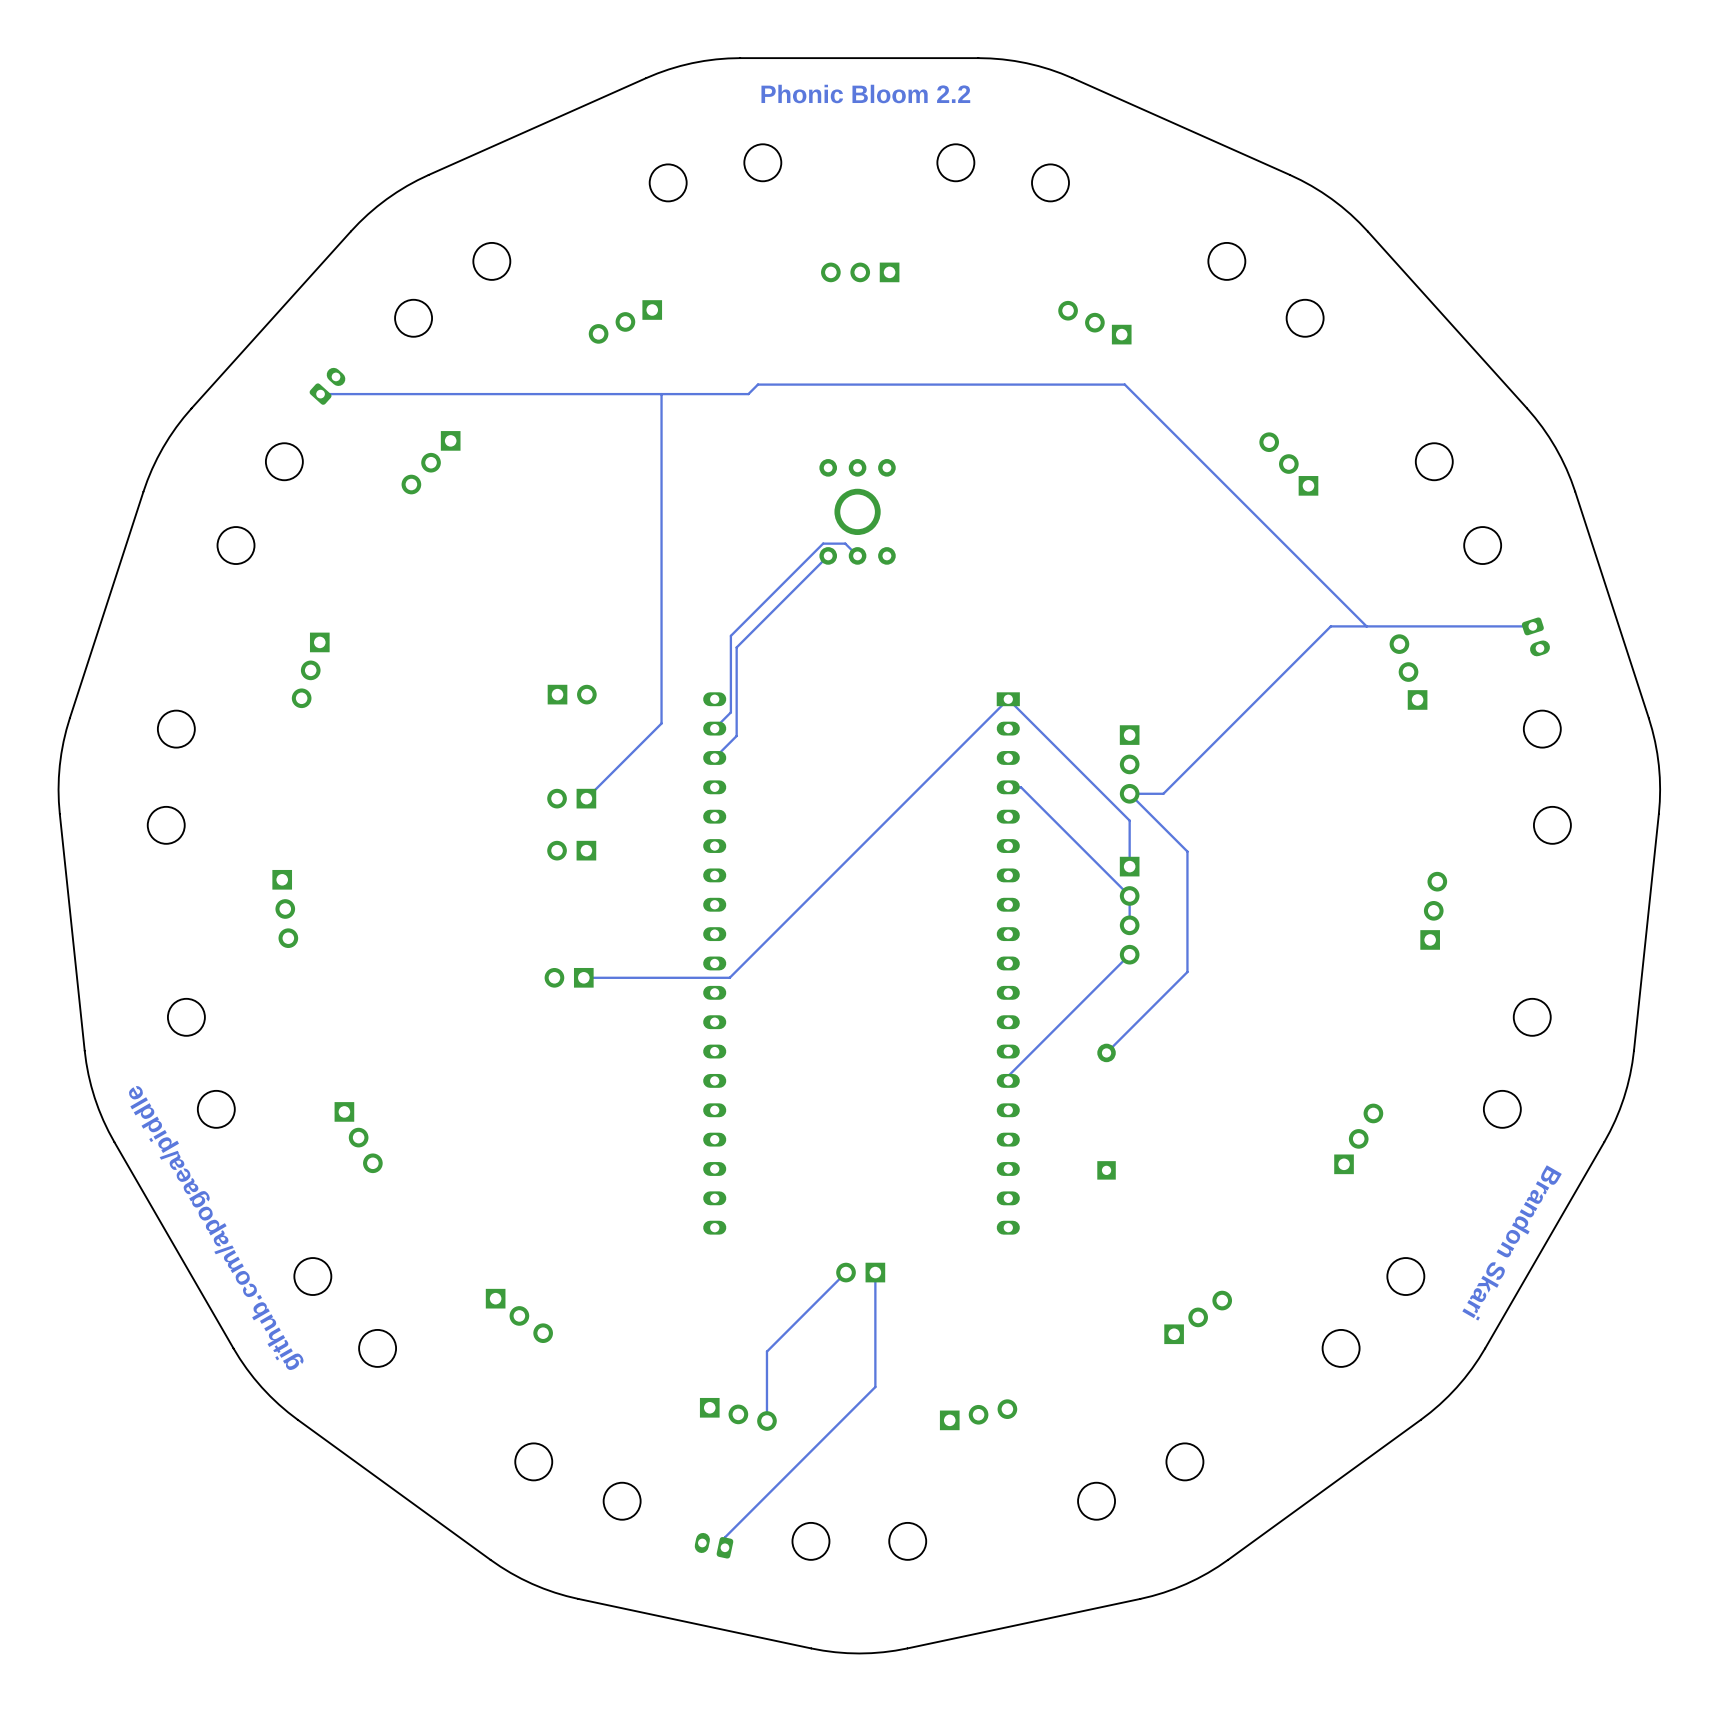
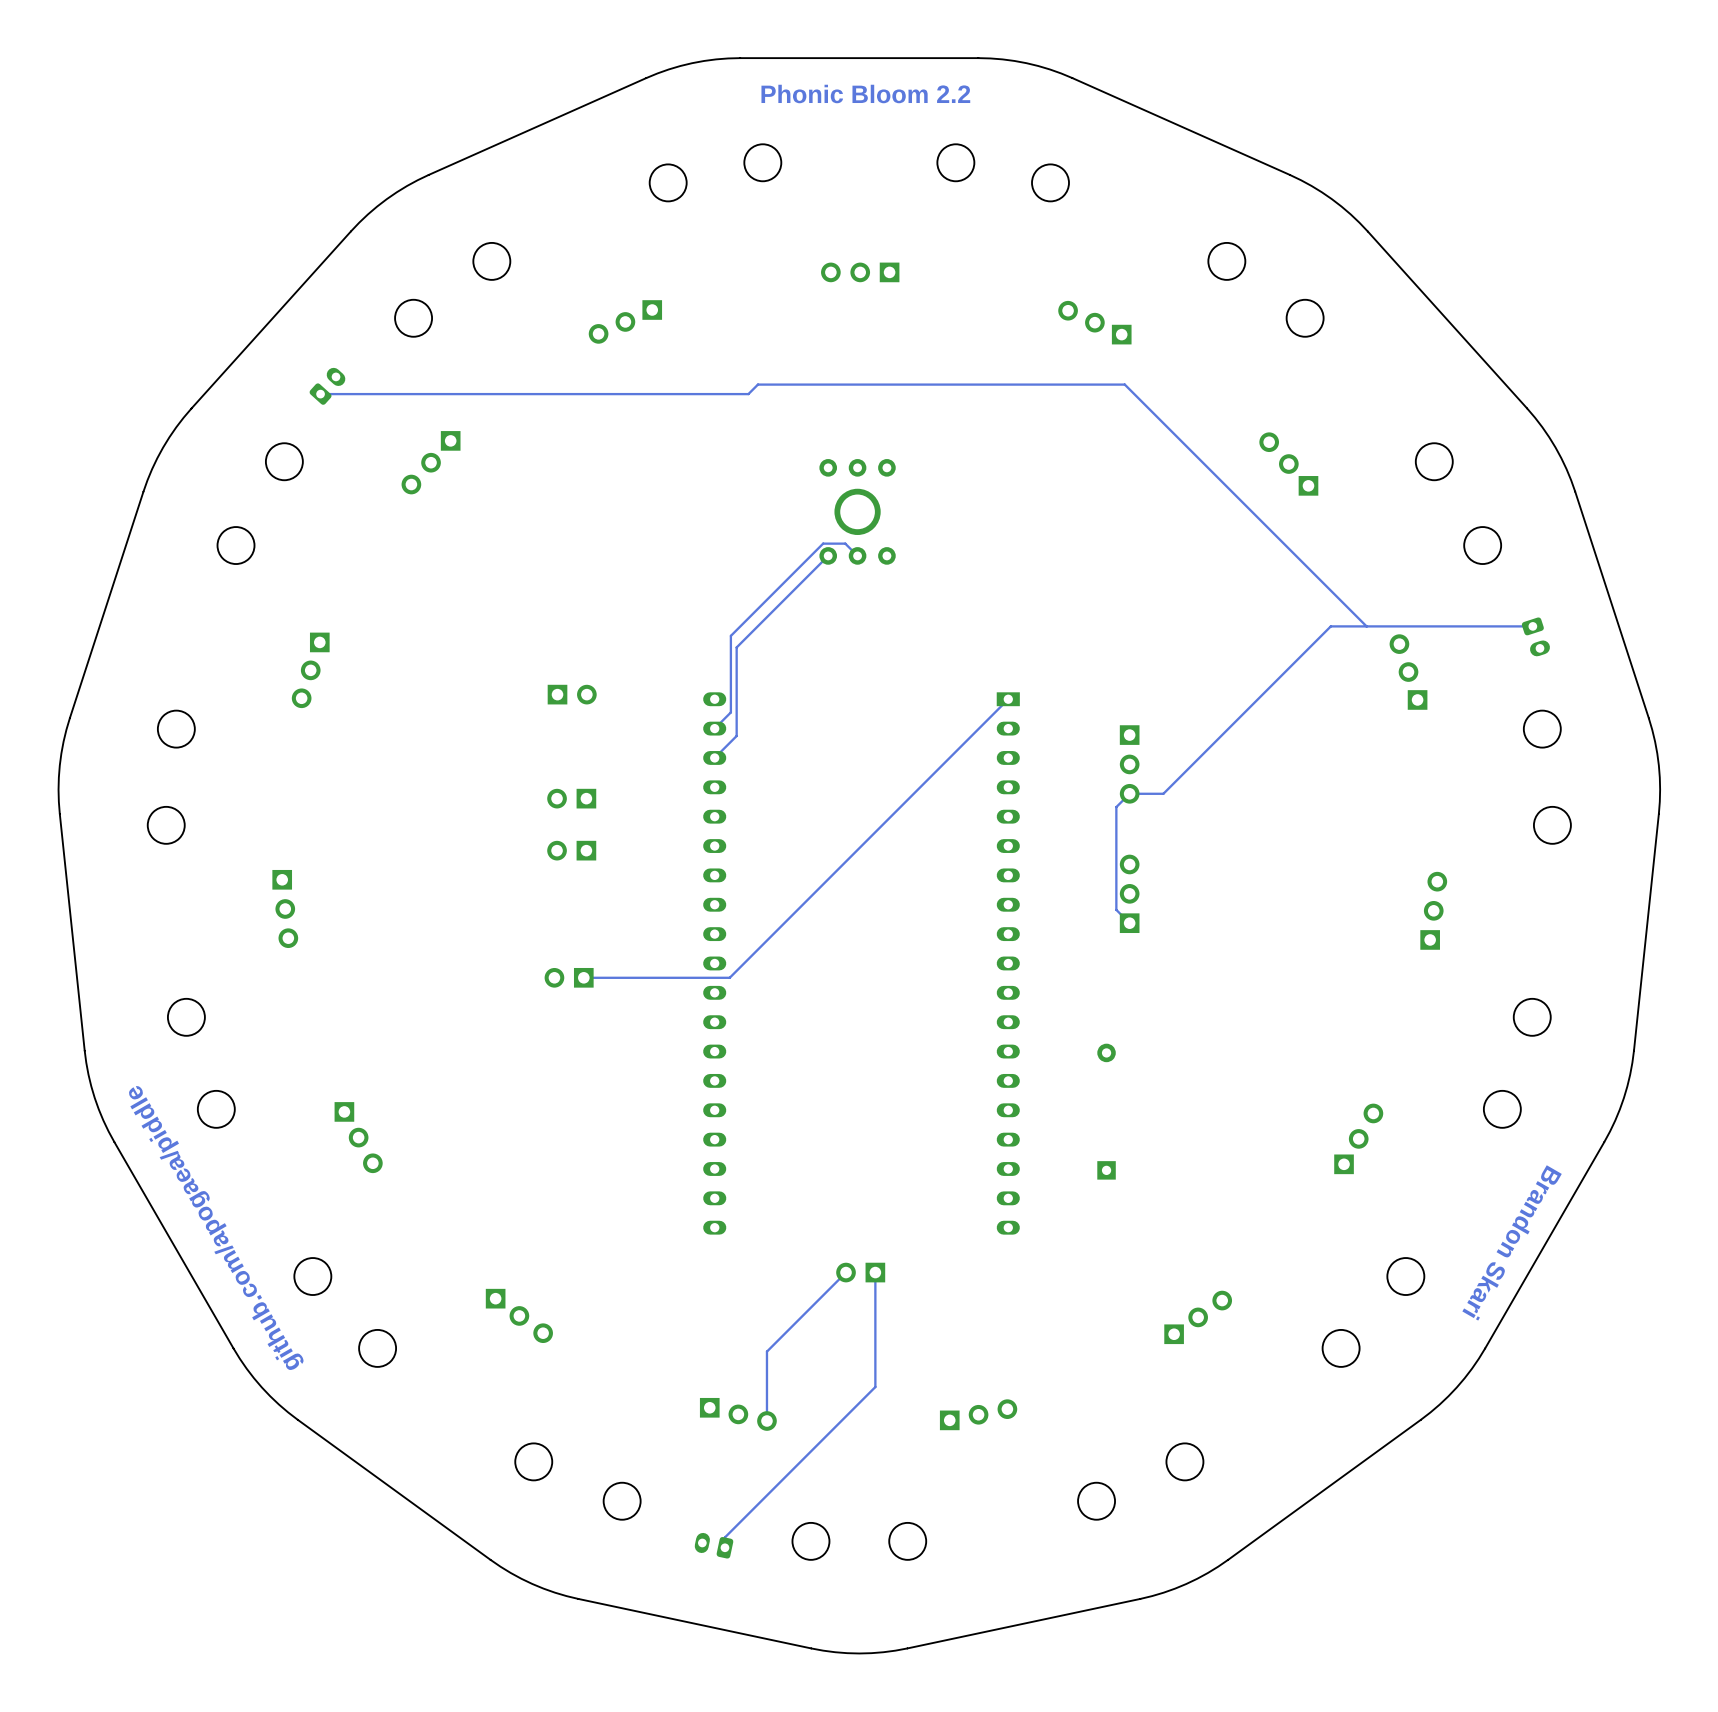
track: (661, 394) (661, 723) (586, 798) -> none
track: (1008, 699) (1129, 820) (1129, 866) -> none
track: (1008, 787) (1021, 787) (1129, 895) (1129, 925) -> none
track: (1129, 793) (1187, 851) (1187, 972) (1106, 1052) -> (1129, 793) (1116, 807) (1116, 909) (1129, 923)
part: none -> (1129, 893)
part: (1129, 910) -> none
track: (1129, 954) (1008, 1076) (1008, 1080) -> none

